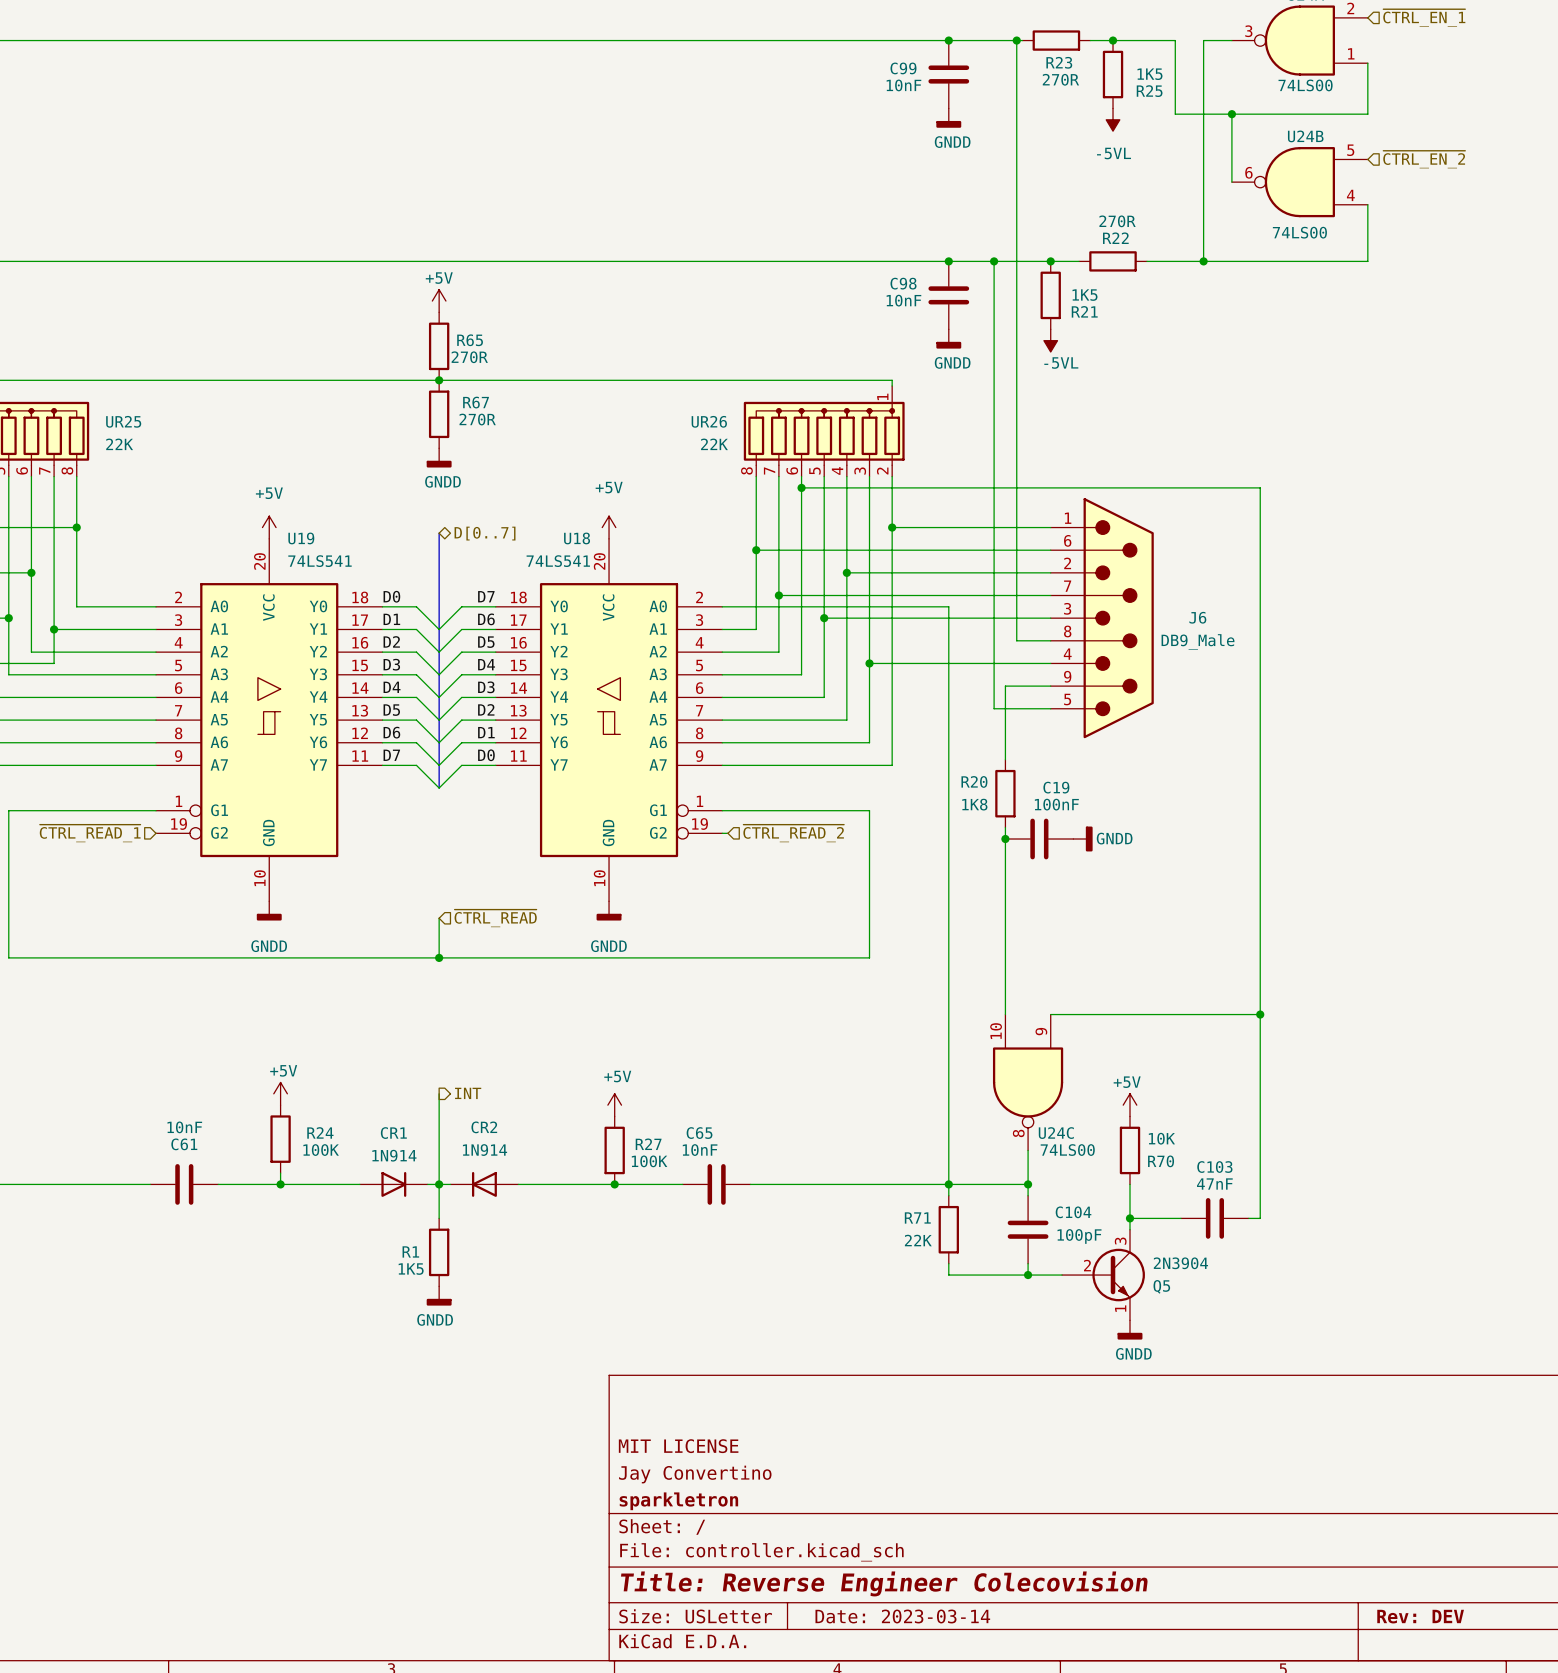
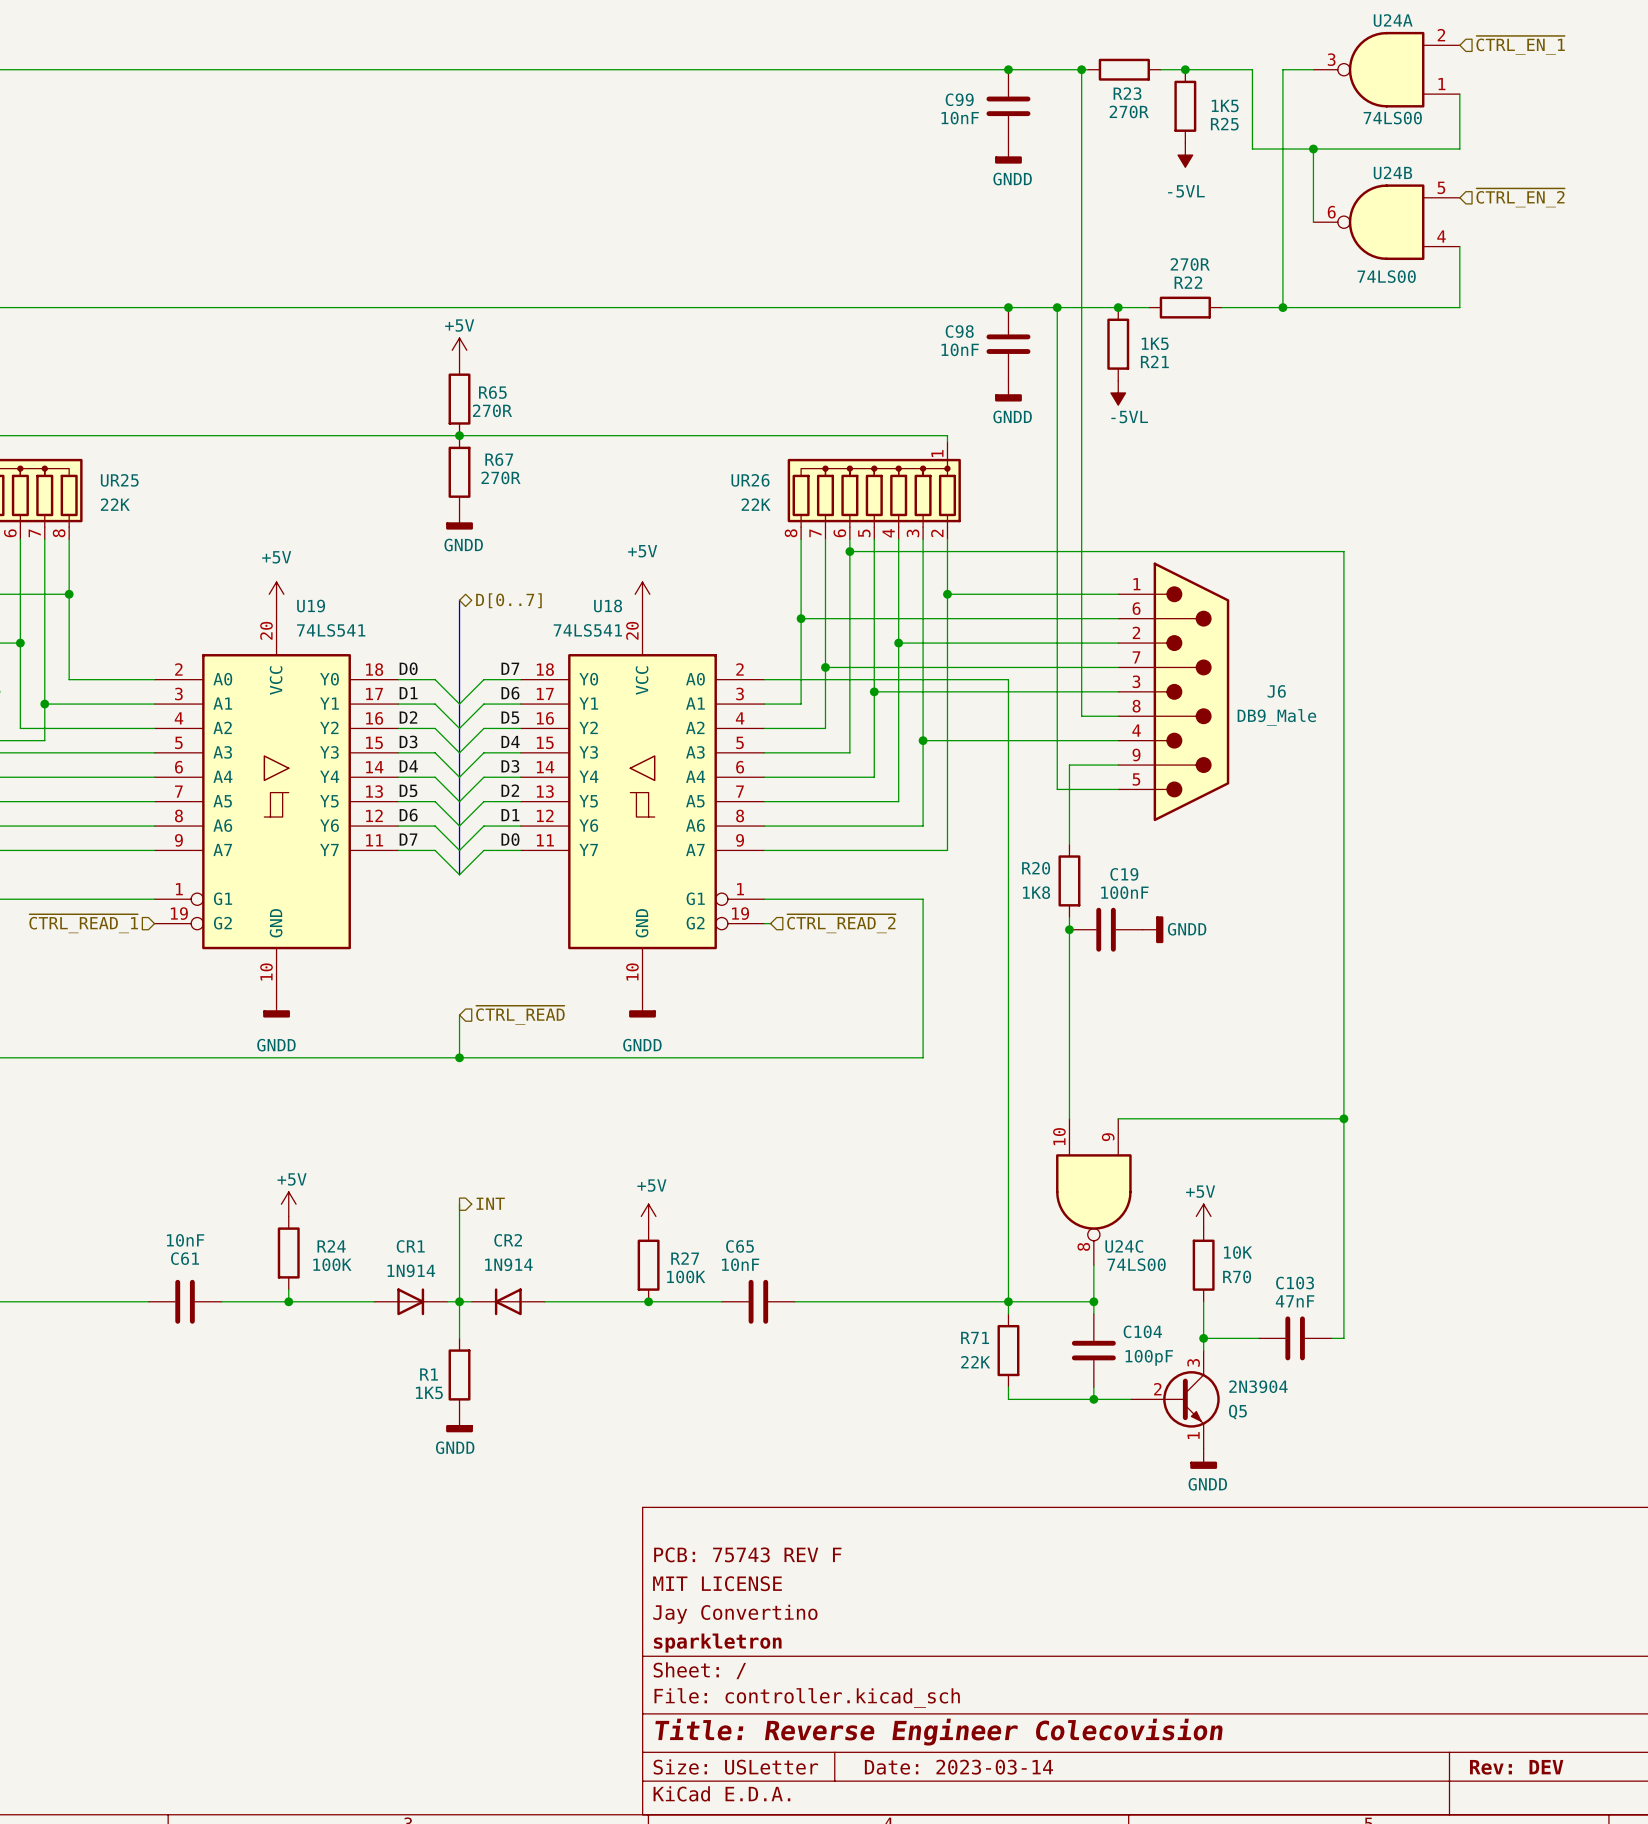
title block: none -> PCB: 75743 REV F (747, 1554)

